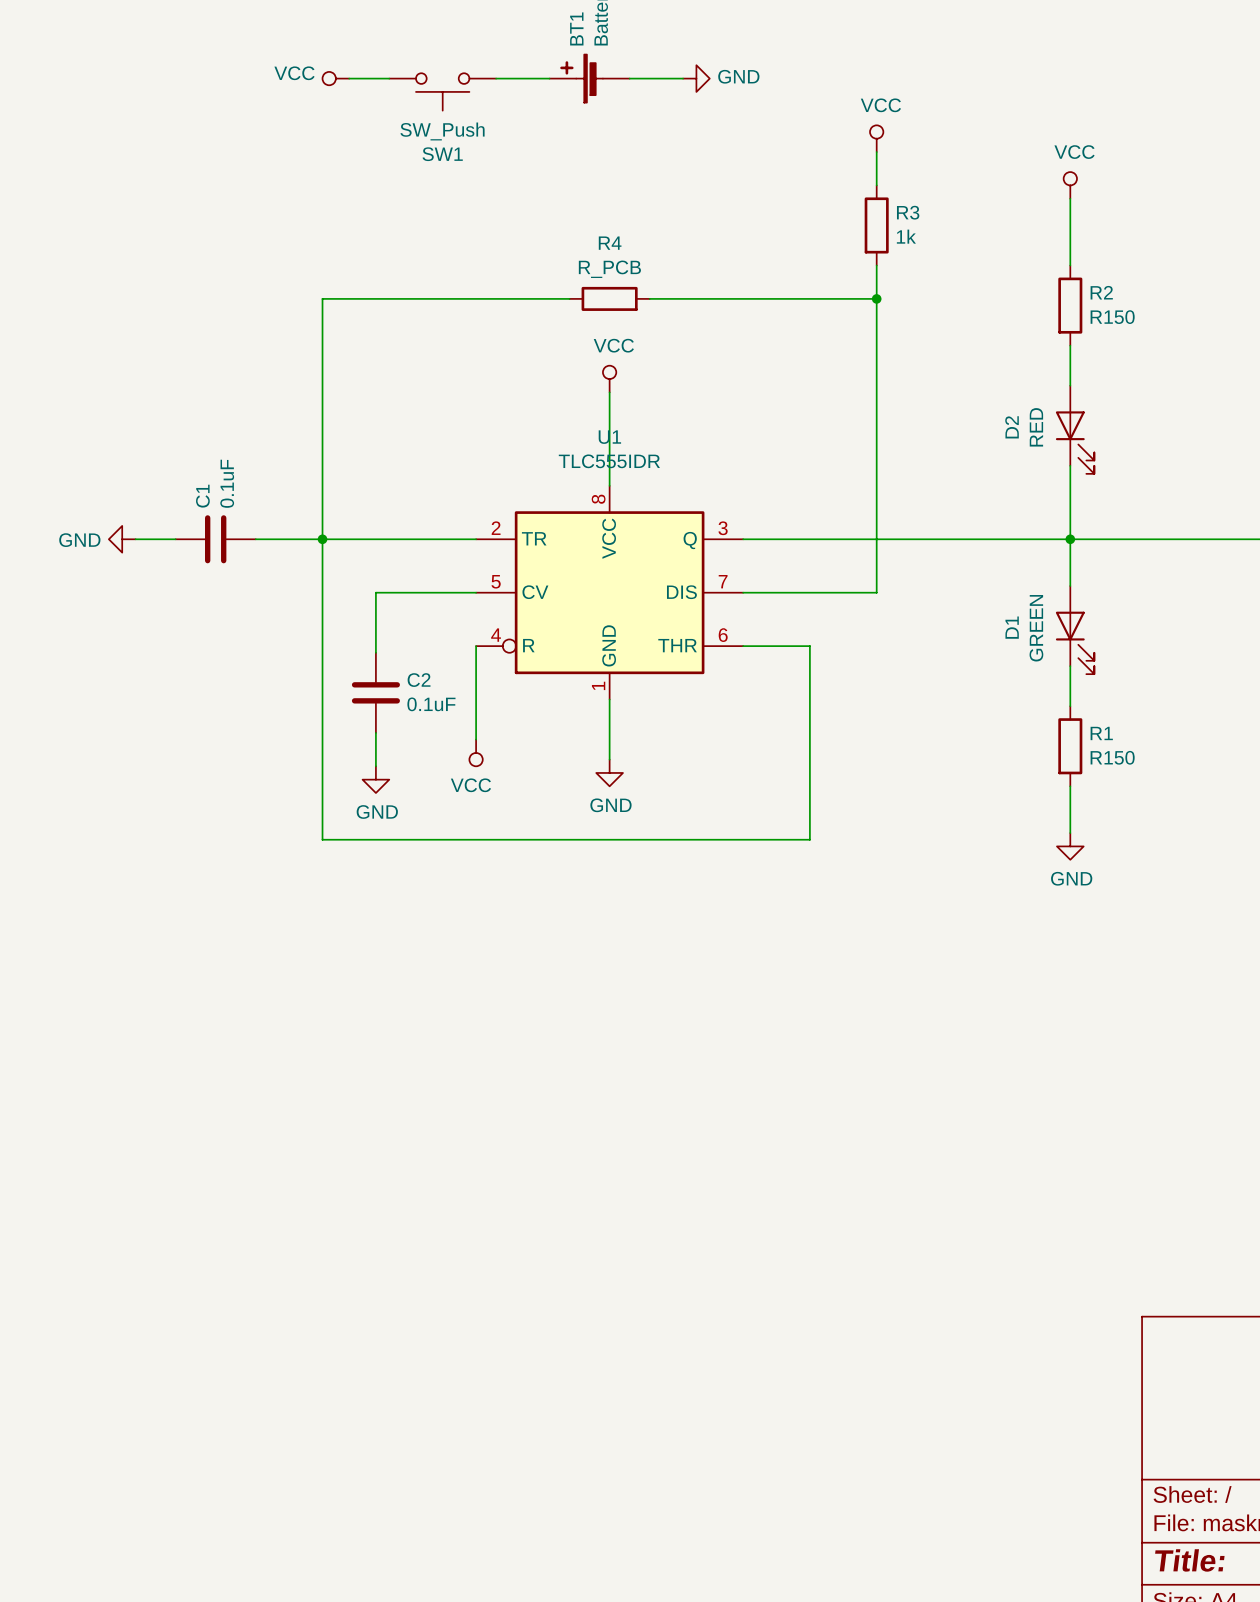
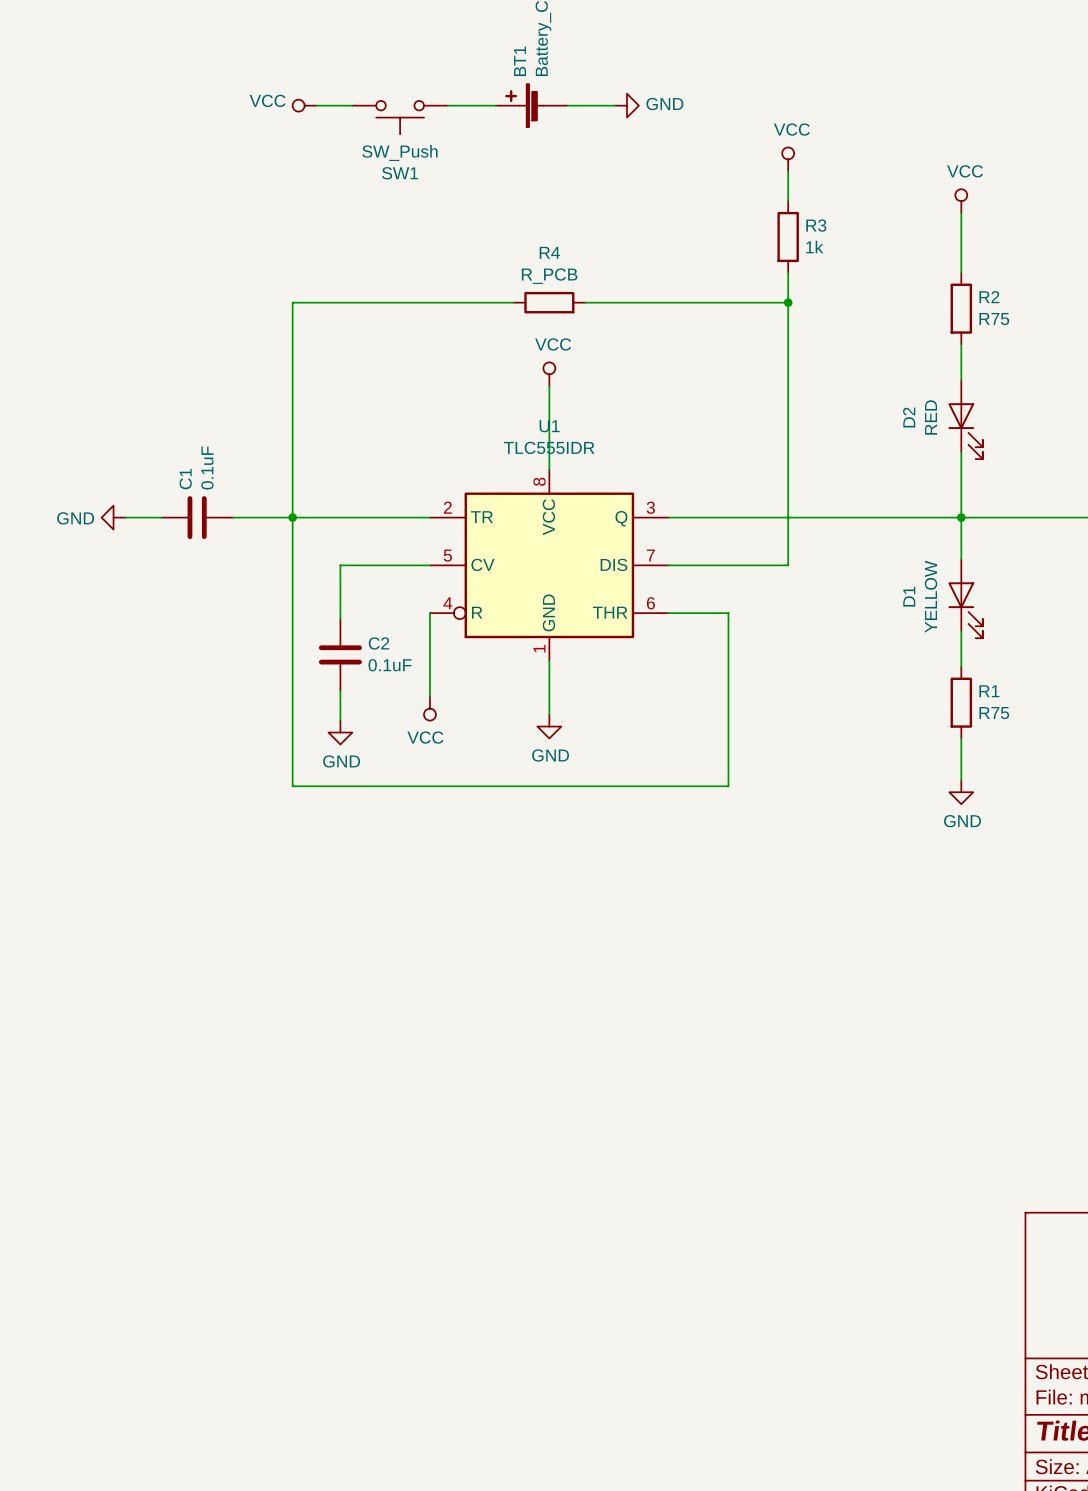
R2 value: R150 (1112, 317) -> R75 (994, 319)
D1 value: GREEN (1036, 628) -> YELLOW (931, 596)
R1 value: R150 (1112, 757) -> R75 (994, 713)

